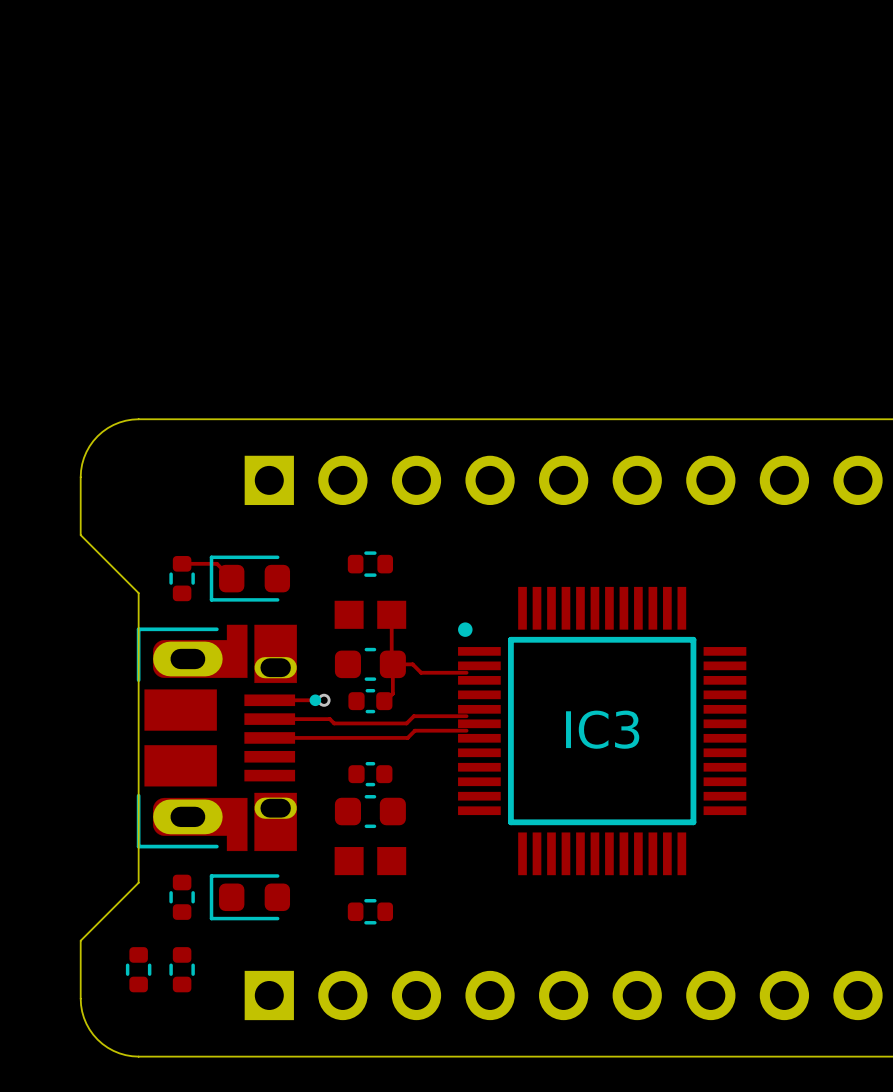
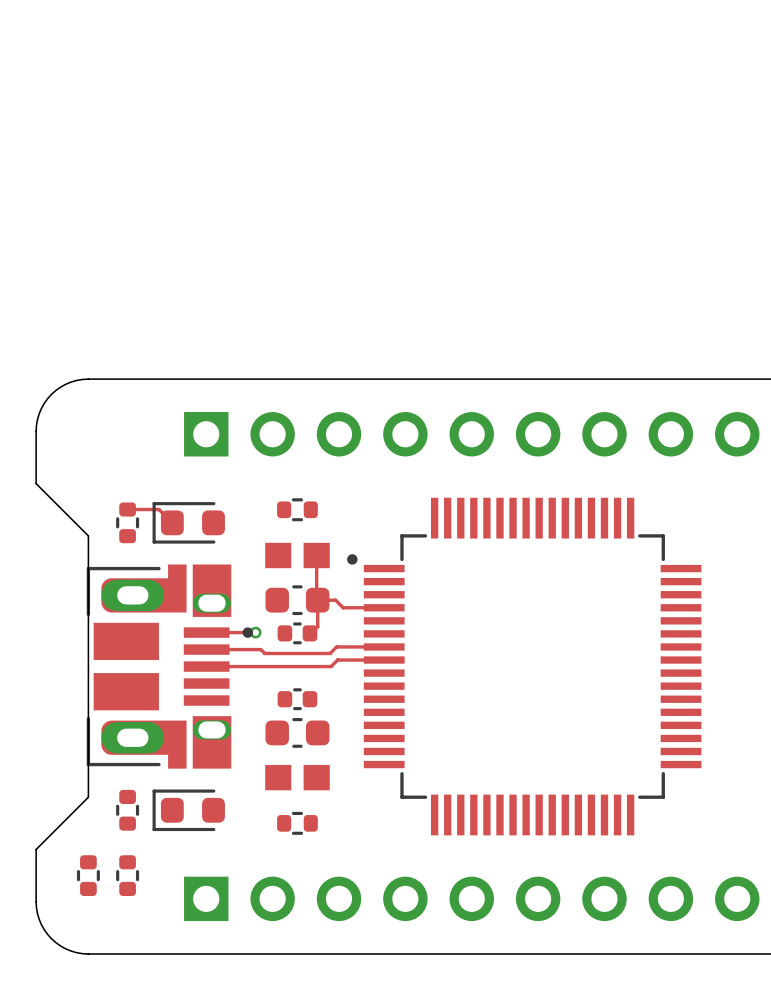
IC3: (602, 731) -> none
part: none -> (524, 666)

